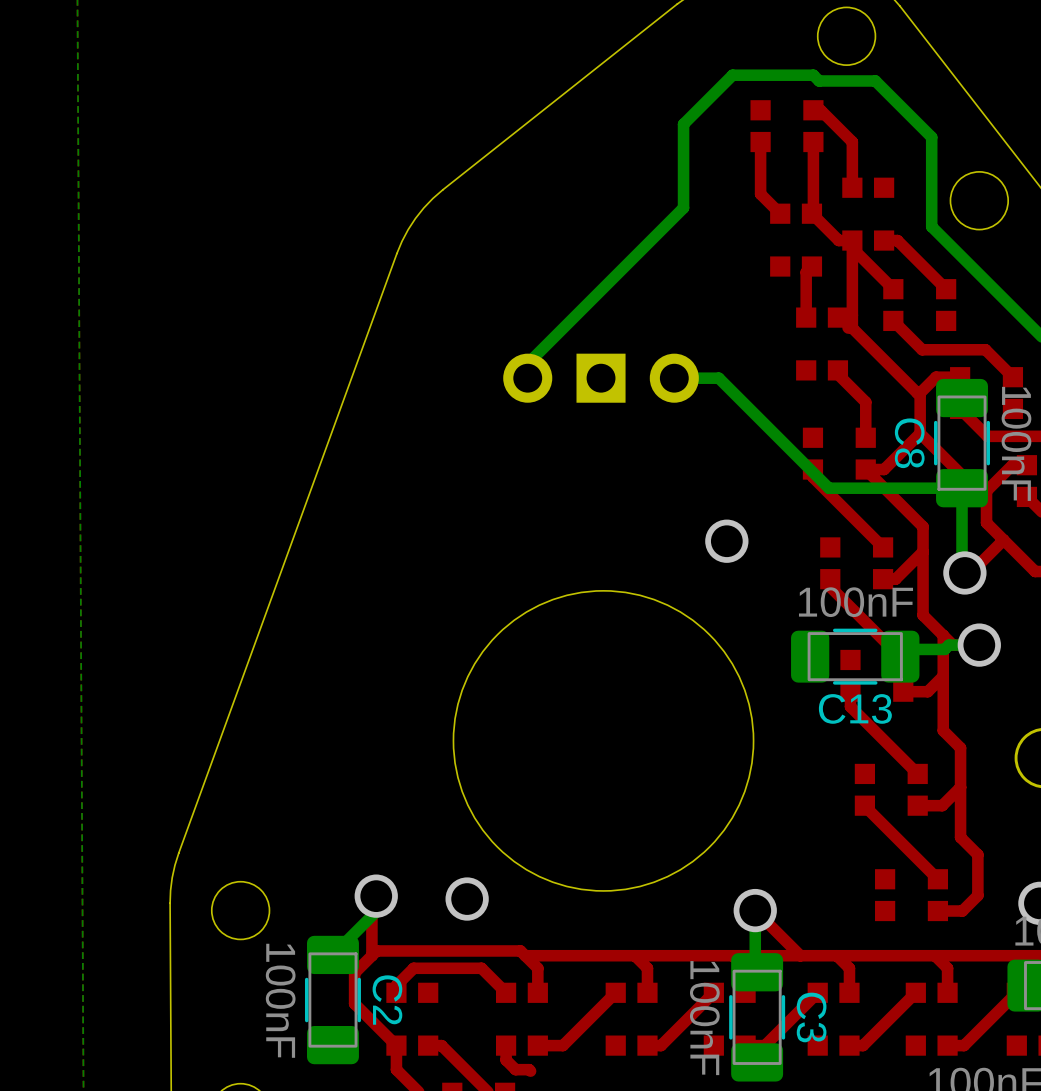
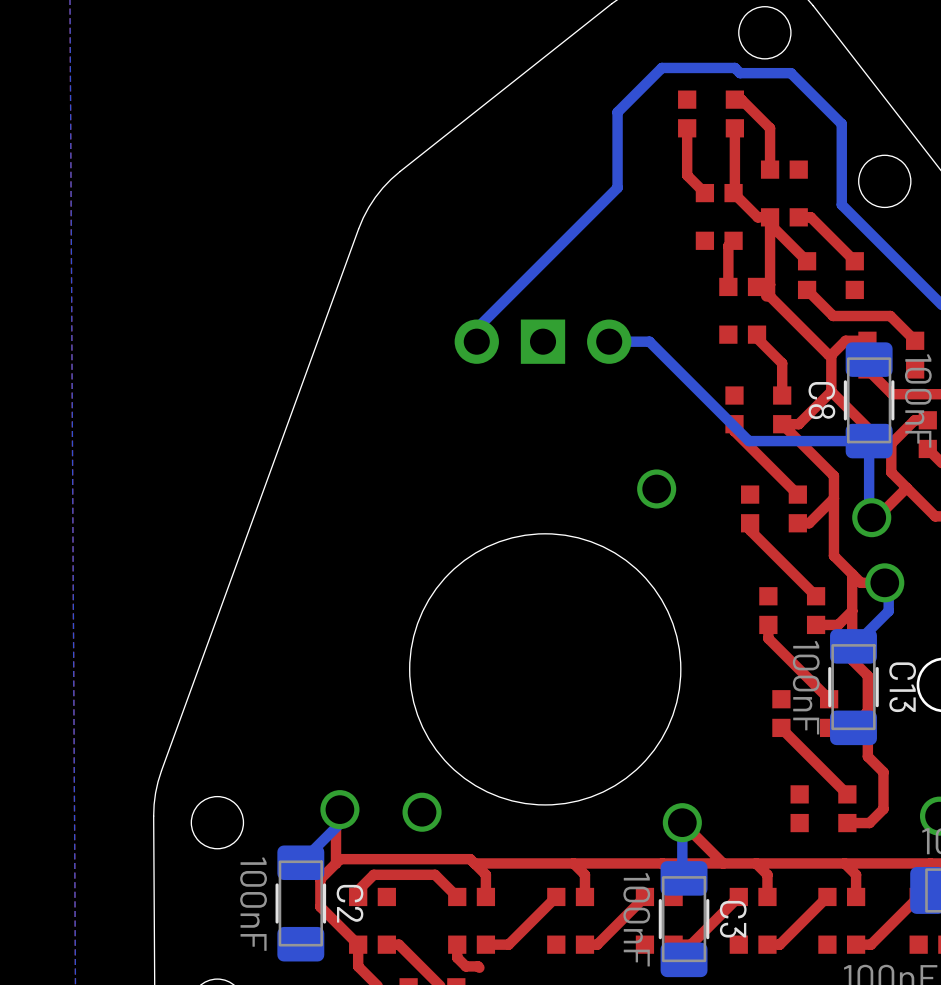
C13 value position: 100nF (856, 602) -> 100nF (806, 687)
bottom track: none -> (888, 581) (888, 611) (853, 646)
bottom track: (979, 645) (949, 645) (944, 649) (907, 649) (900, 656) -> none
C13 rotation: 0° (855, 656) -> 90° clockwise (853, 687)
C13 position: (855, 656) -> (853, 687)
C13 name position: C13 (855, 708) -> C13 (902, 687)

